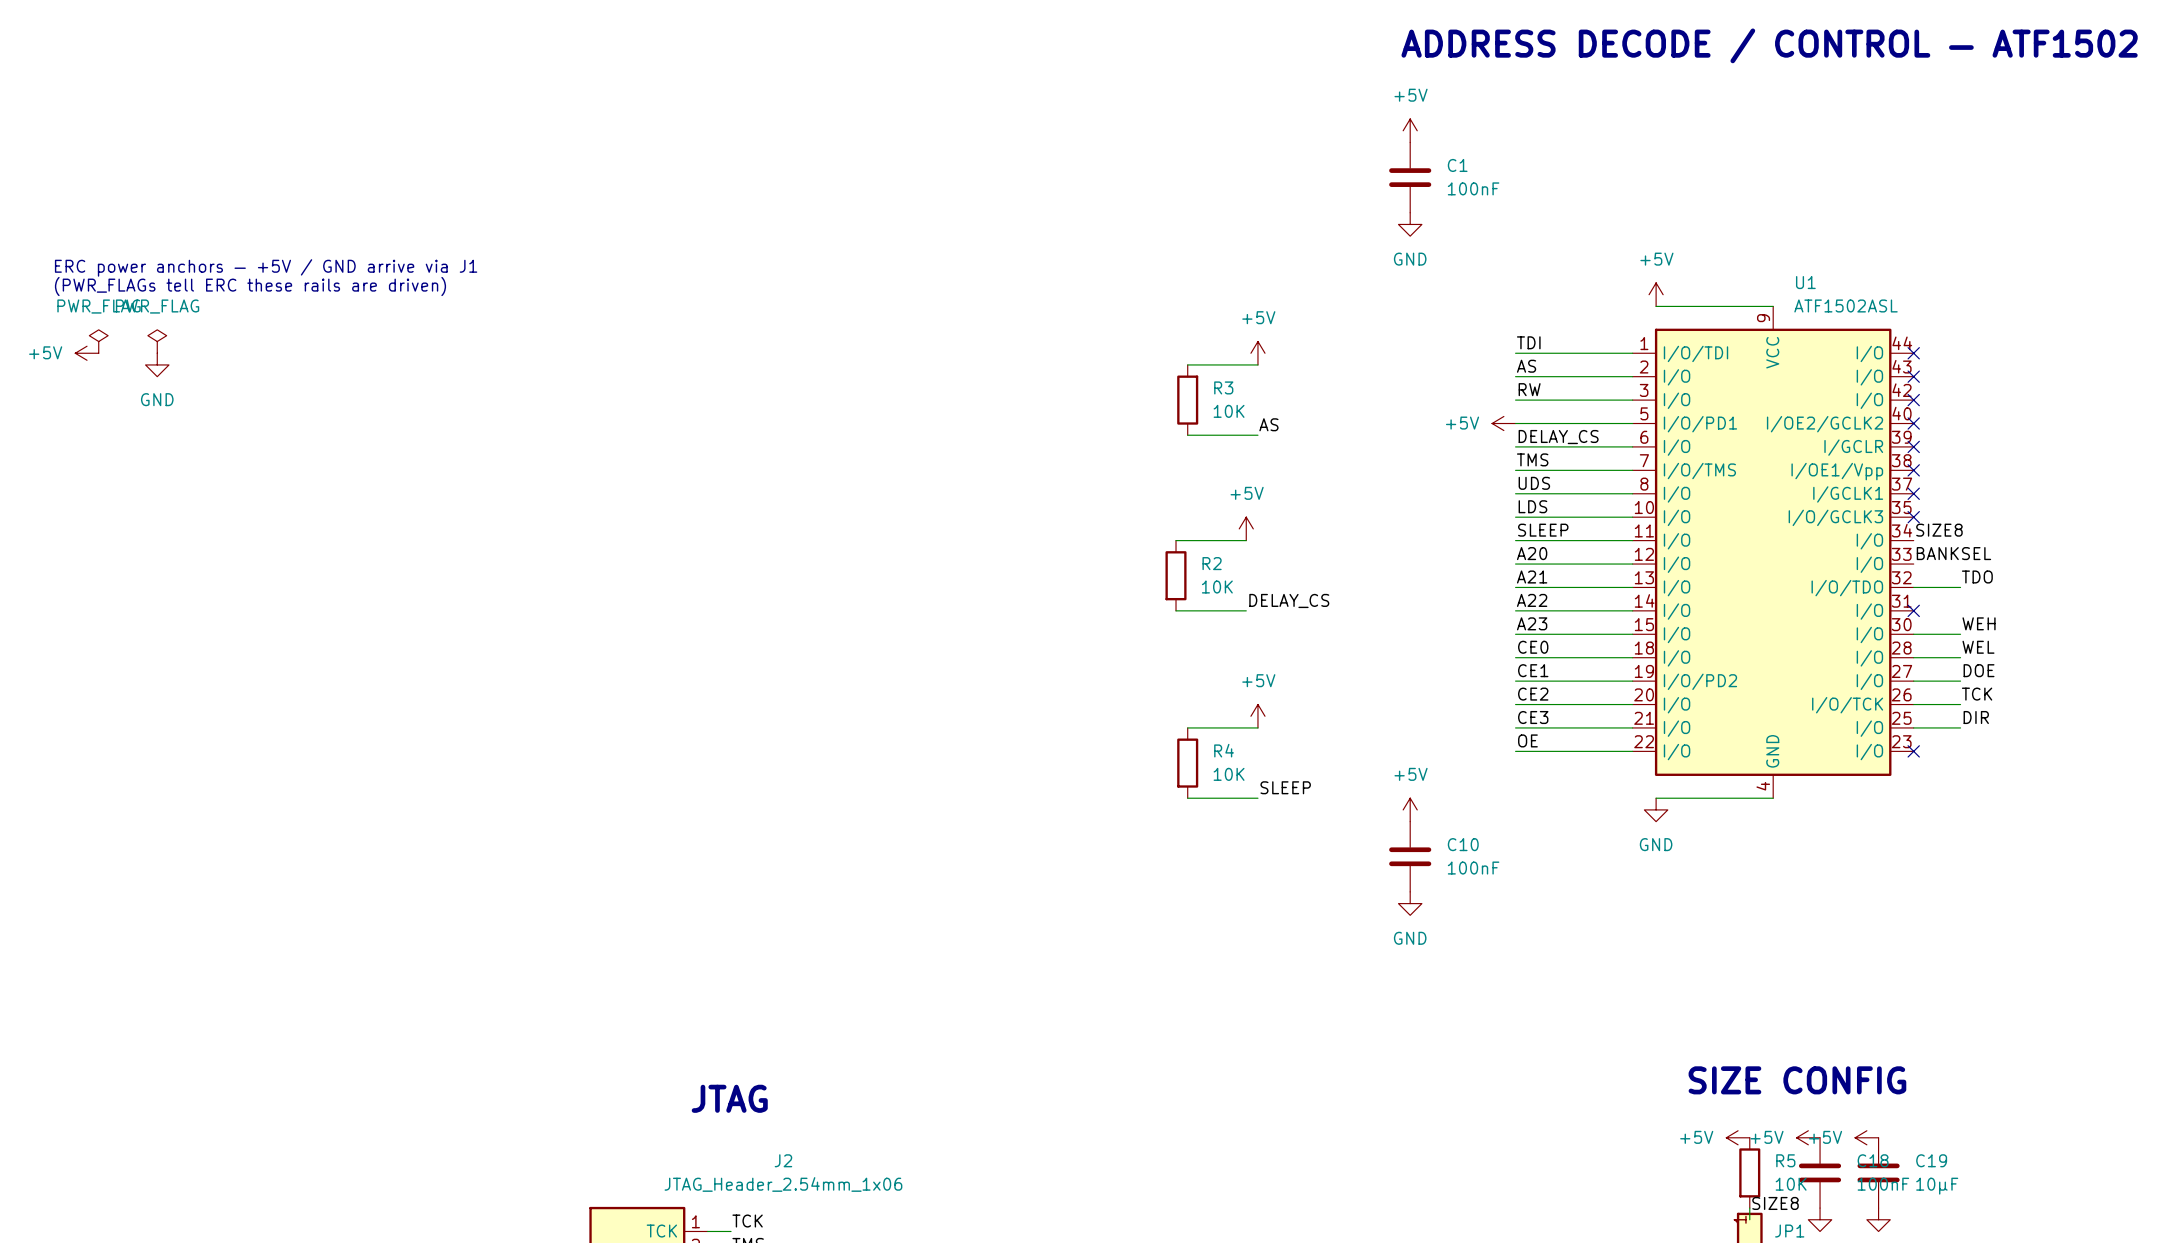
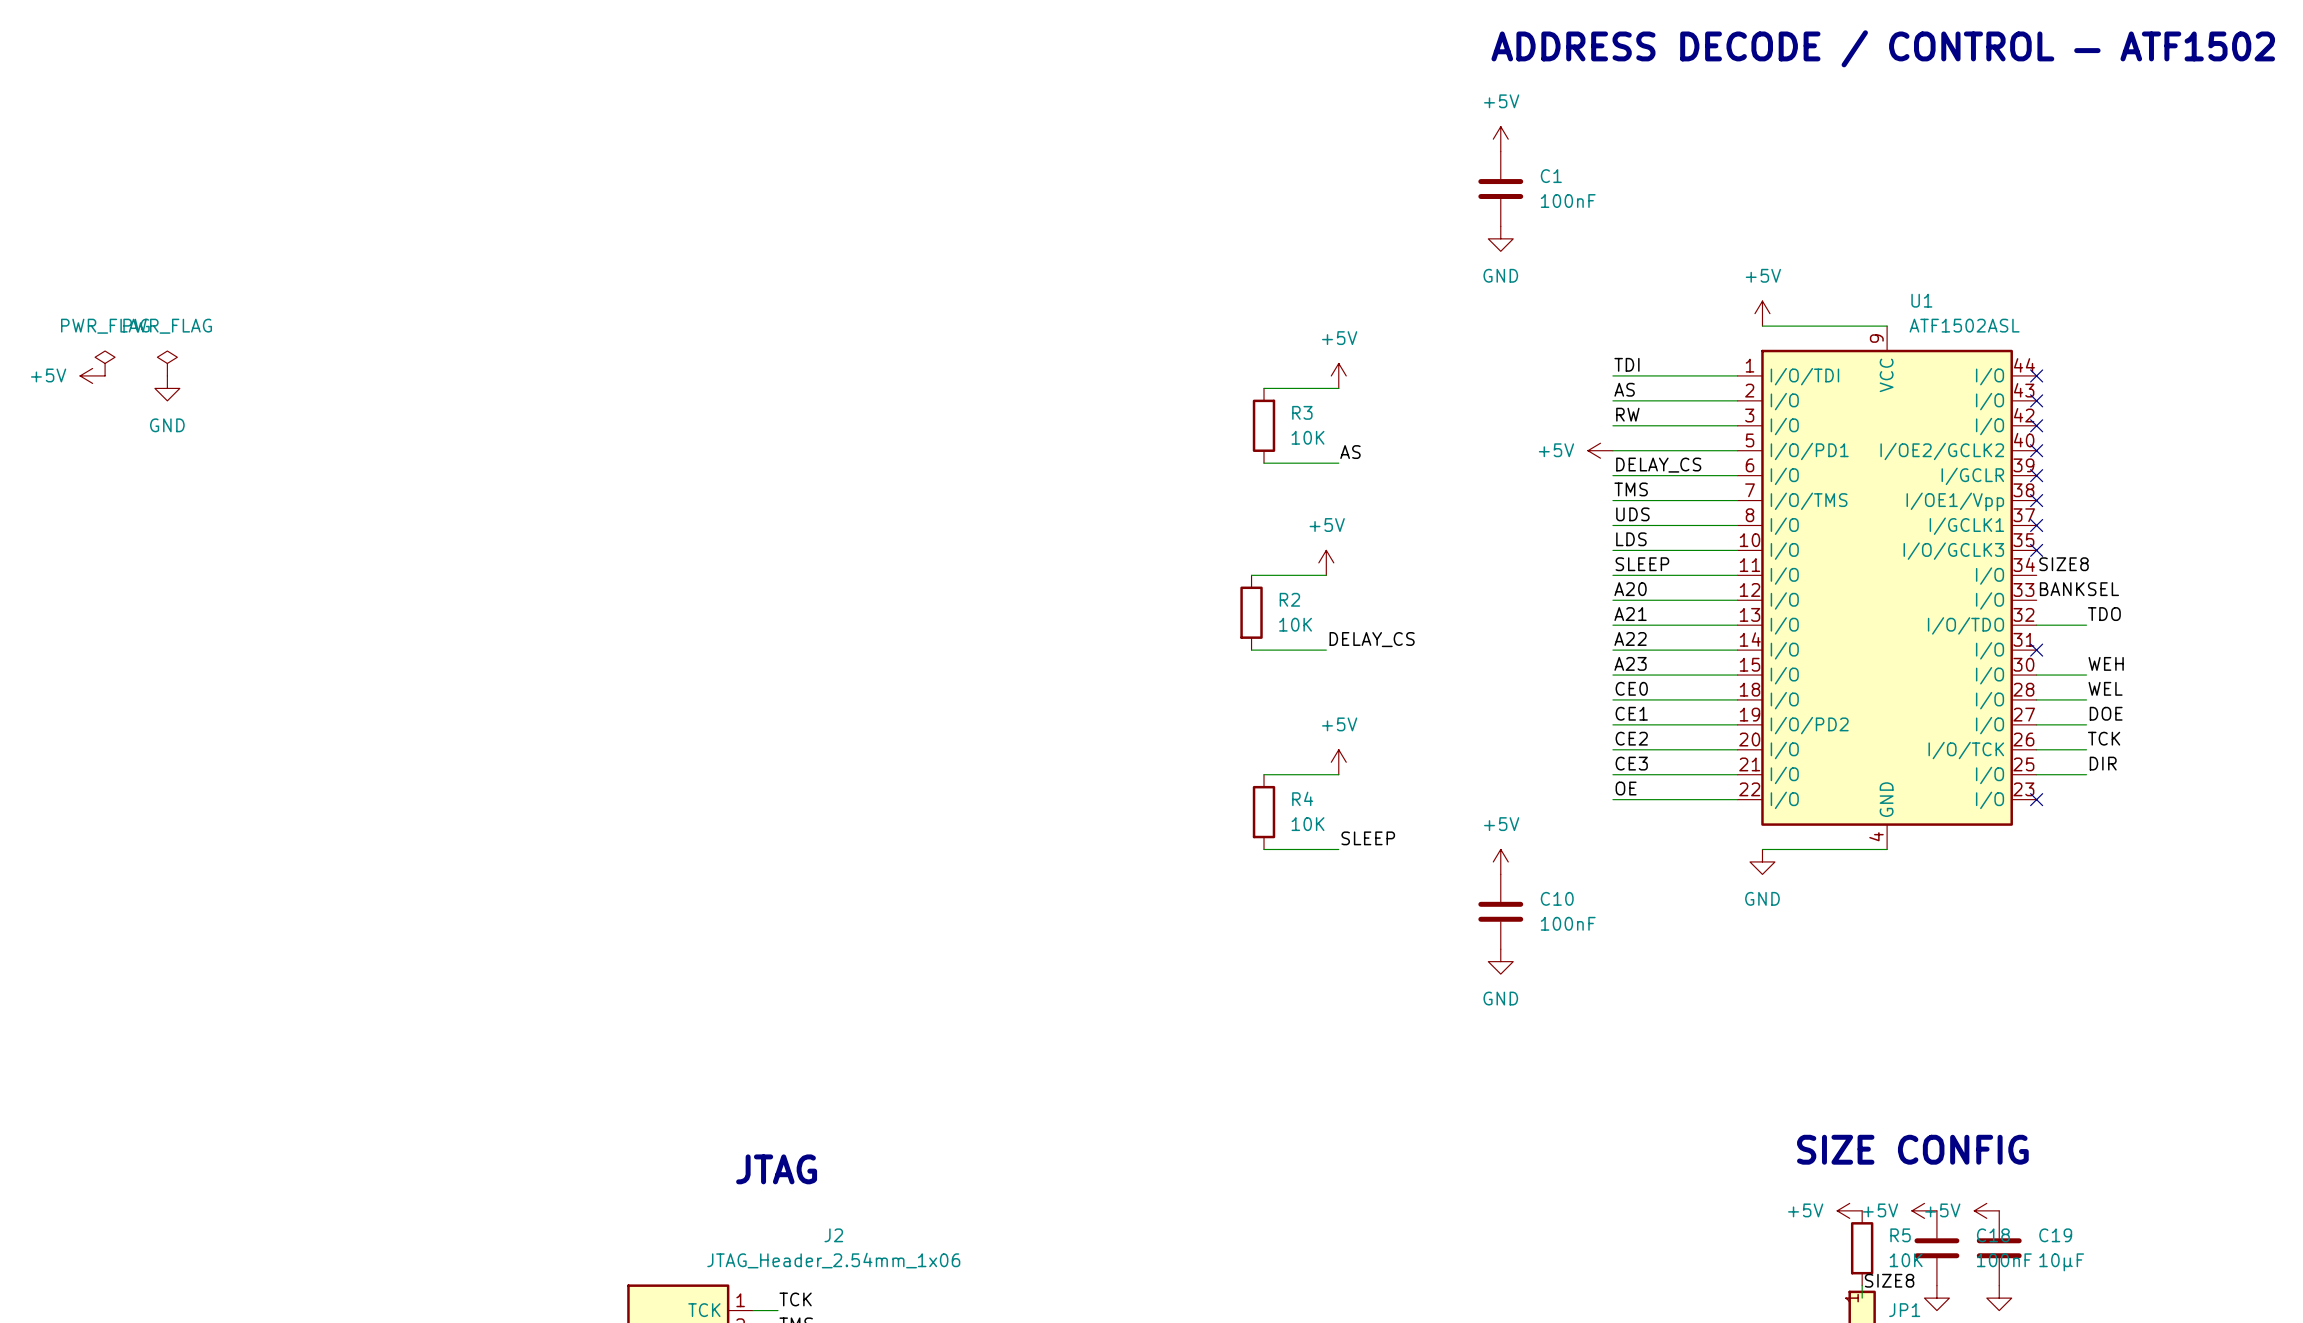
text: ERC power anchors — +5V / GND arrive via J1 (266, 267) -> none
text: (PWR_FLAGs tell ERC these rails are driven) (250, 286) -> none

